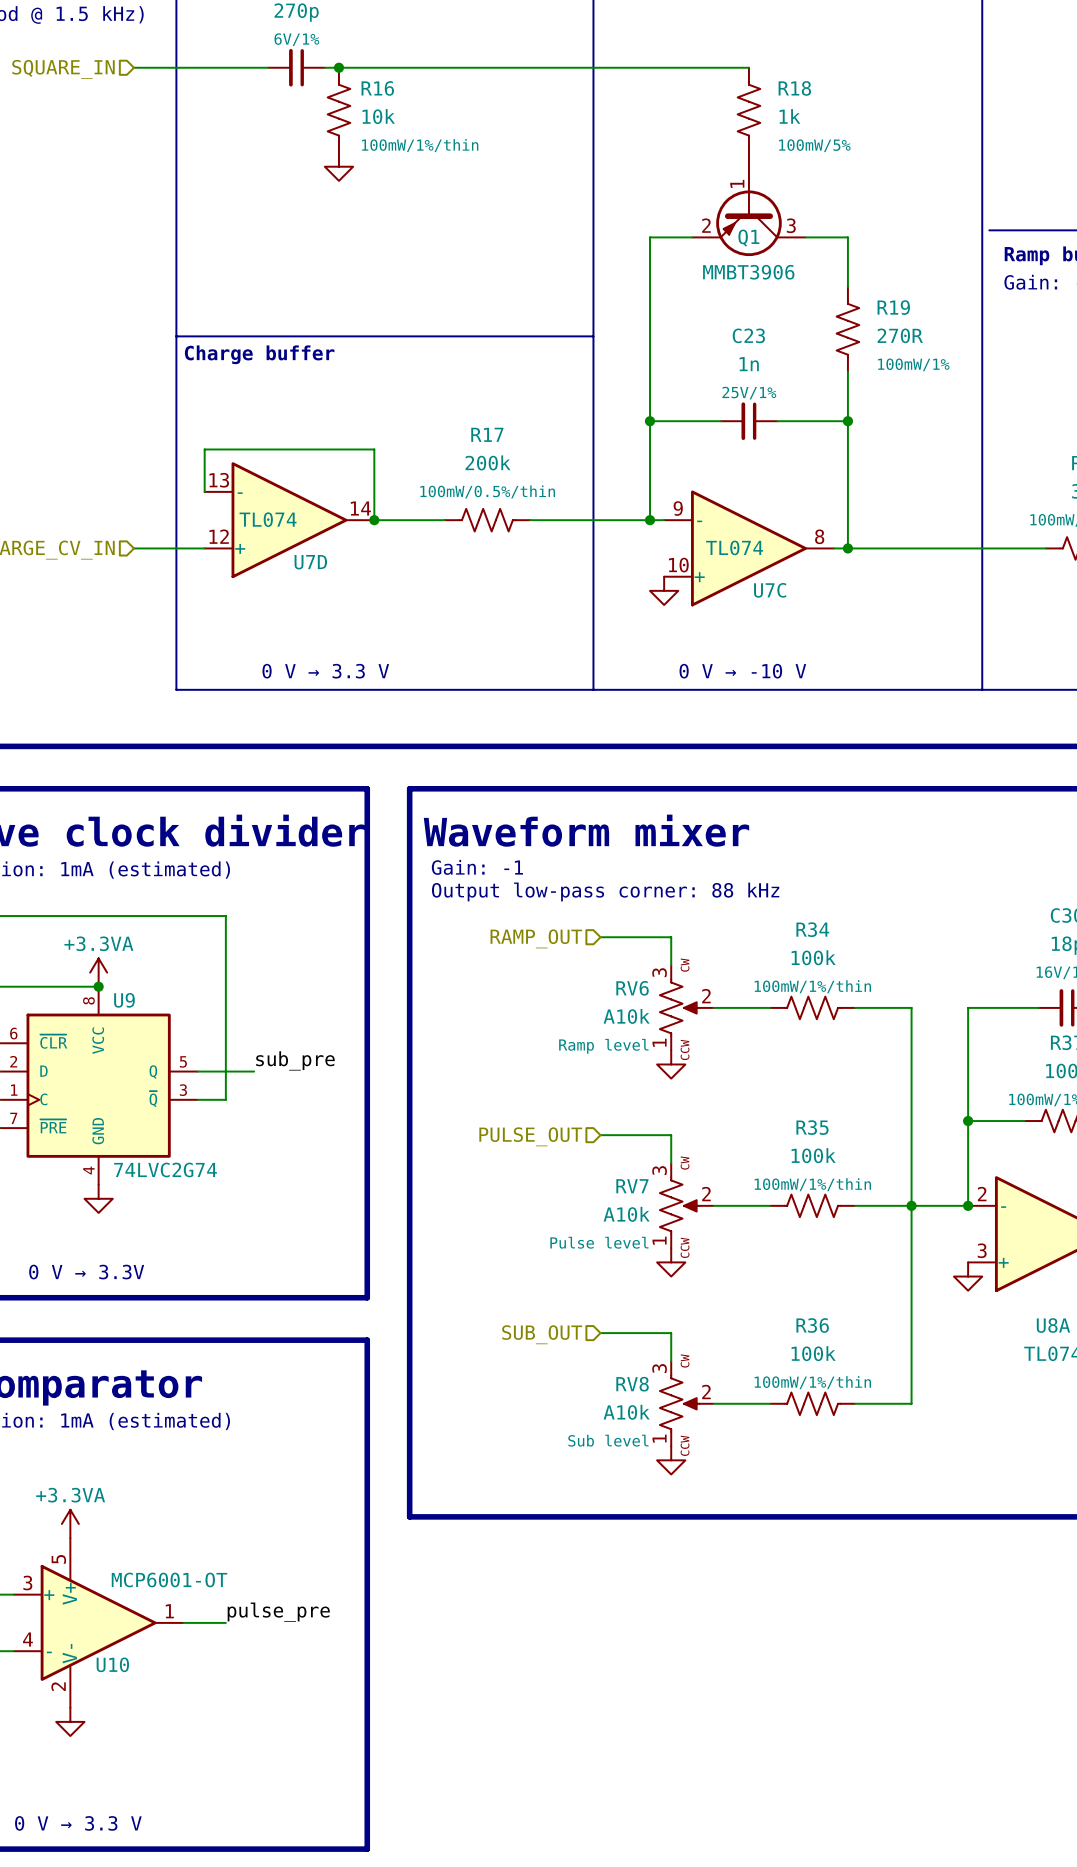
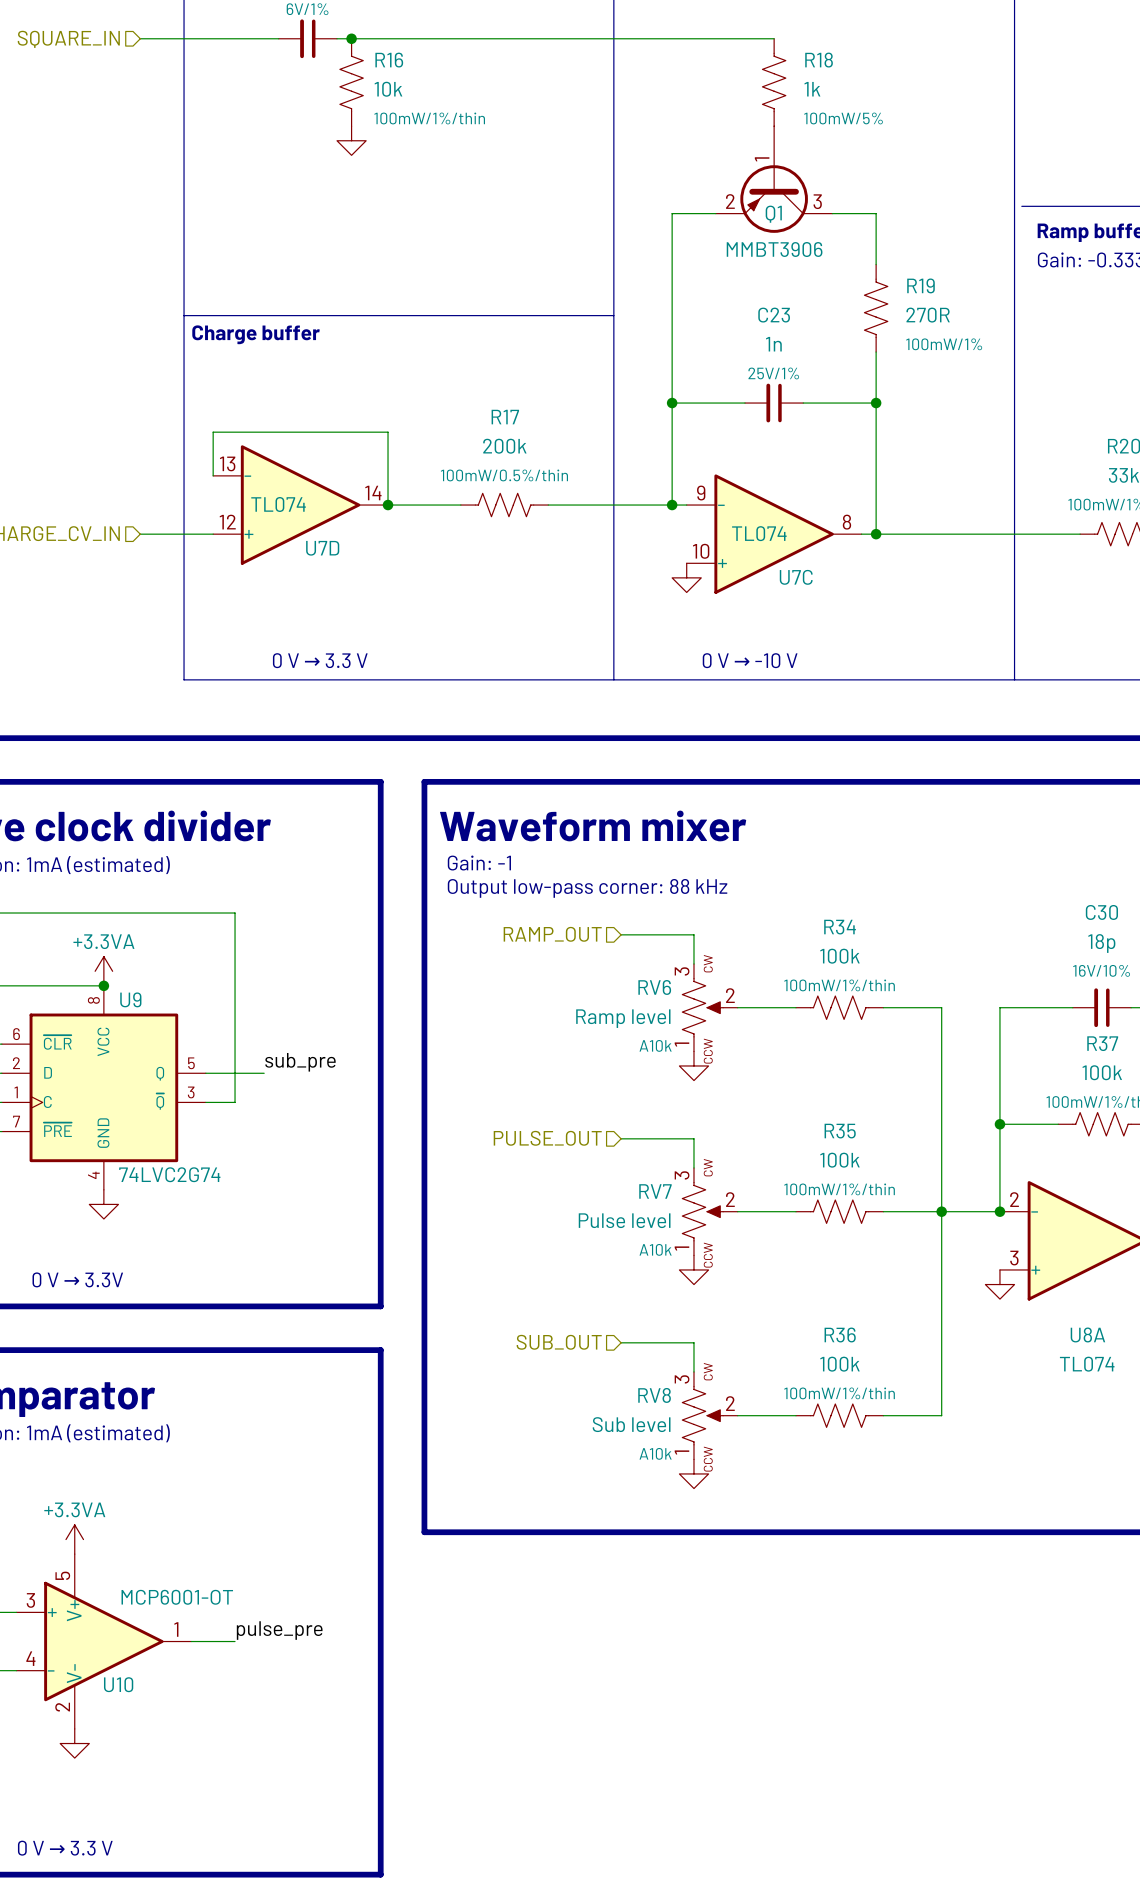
RV6 value: A10k (626, 1016) -> Ramp level (623, 1018)
RV6 text: Ramp level (603, 1046) -> A10k (655, 1045)
RV7 value: A10k (626, 1214) -> Pulse level (624, 1220)
RV7 text: Pulse level (599, 1242) -> A10k (655, 1249)
RV8 value: A10k (626, 1412) -> Sub level (631, 1424)
RV8 text: Sub level (608, 1440) -> A10k (655, 1453)

